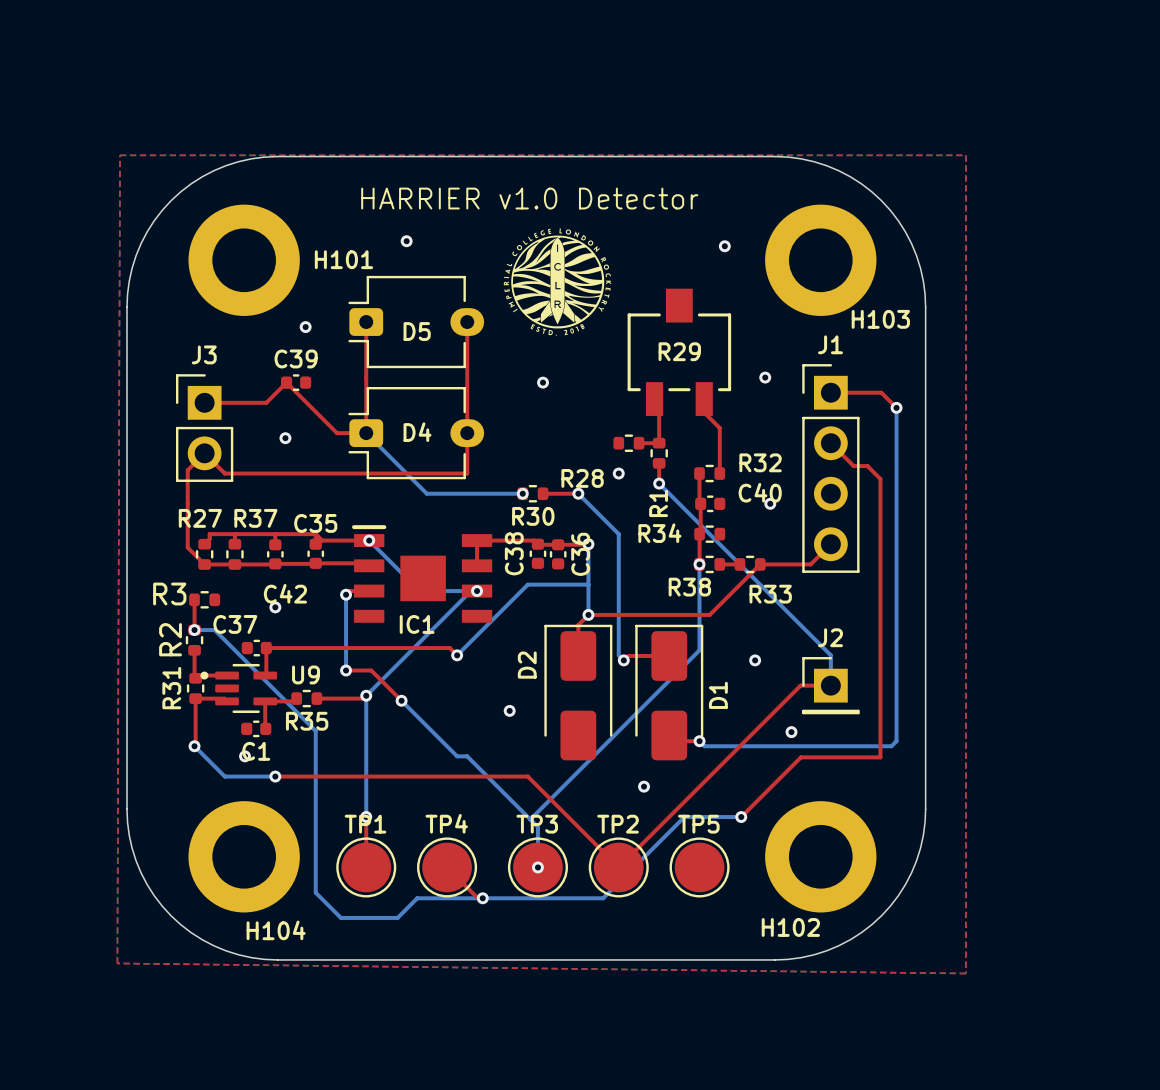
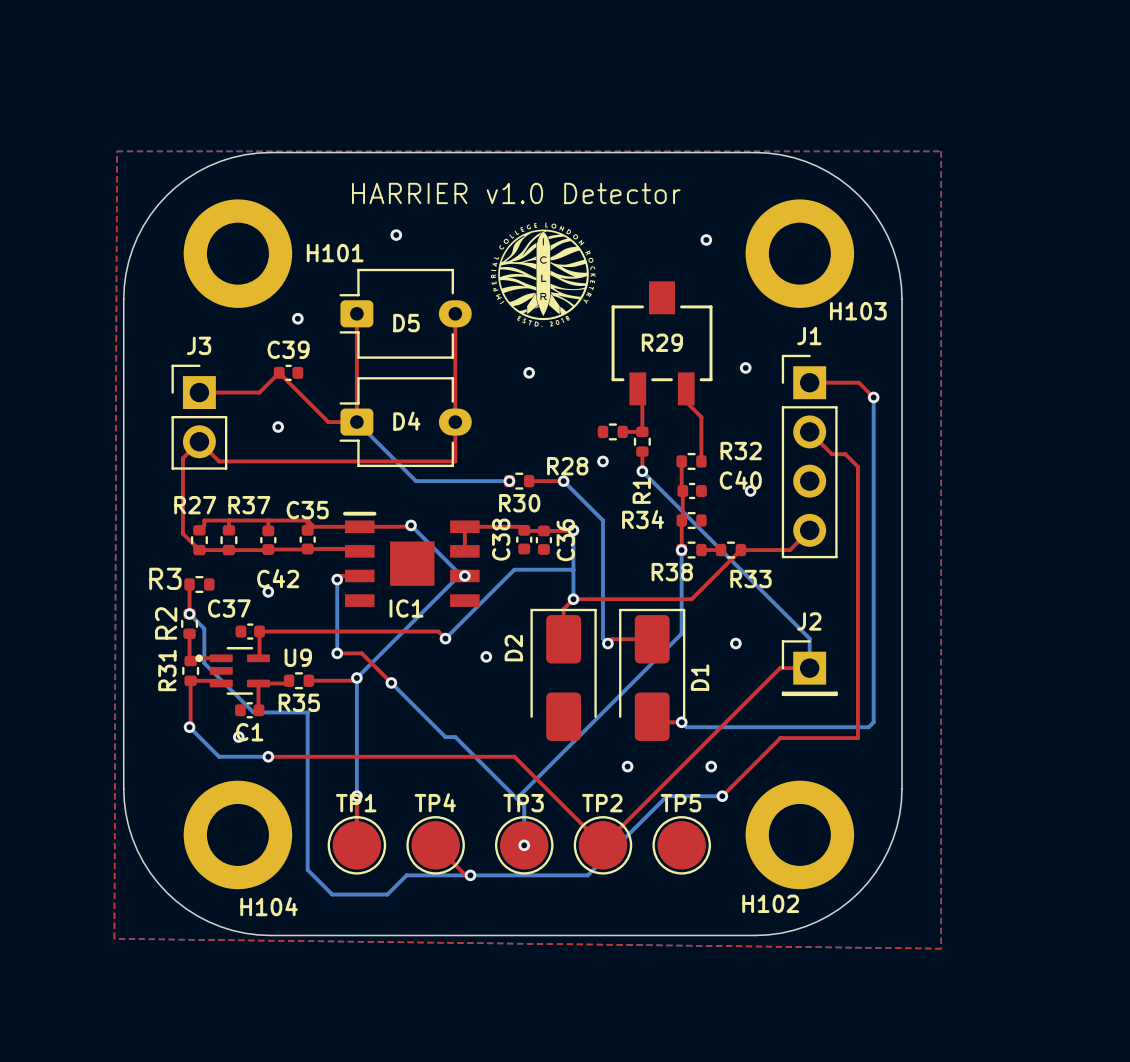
top track: none -> (411, 525) (359, 526)
bottom track: none -> (411, 525) (461, 575)
bottom track: (369, 540) (419, 591) (470, 591) -> none
via position: (369, 540) -> (411, 525)
bottom track: (194, 630) (214, 630) (315, 731) -> (189, 613) (204, 628) (204, 663) (253, 712) (307, 712)
via position: (509, 710) -> (486, 656)
via position: (791, 732) -> (711, 766)

